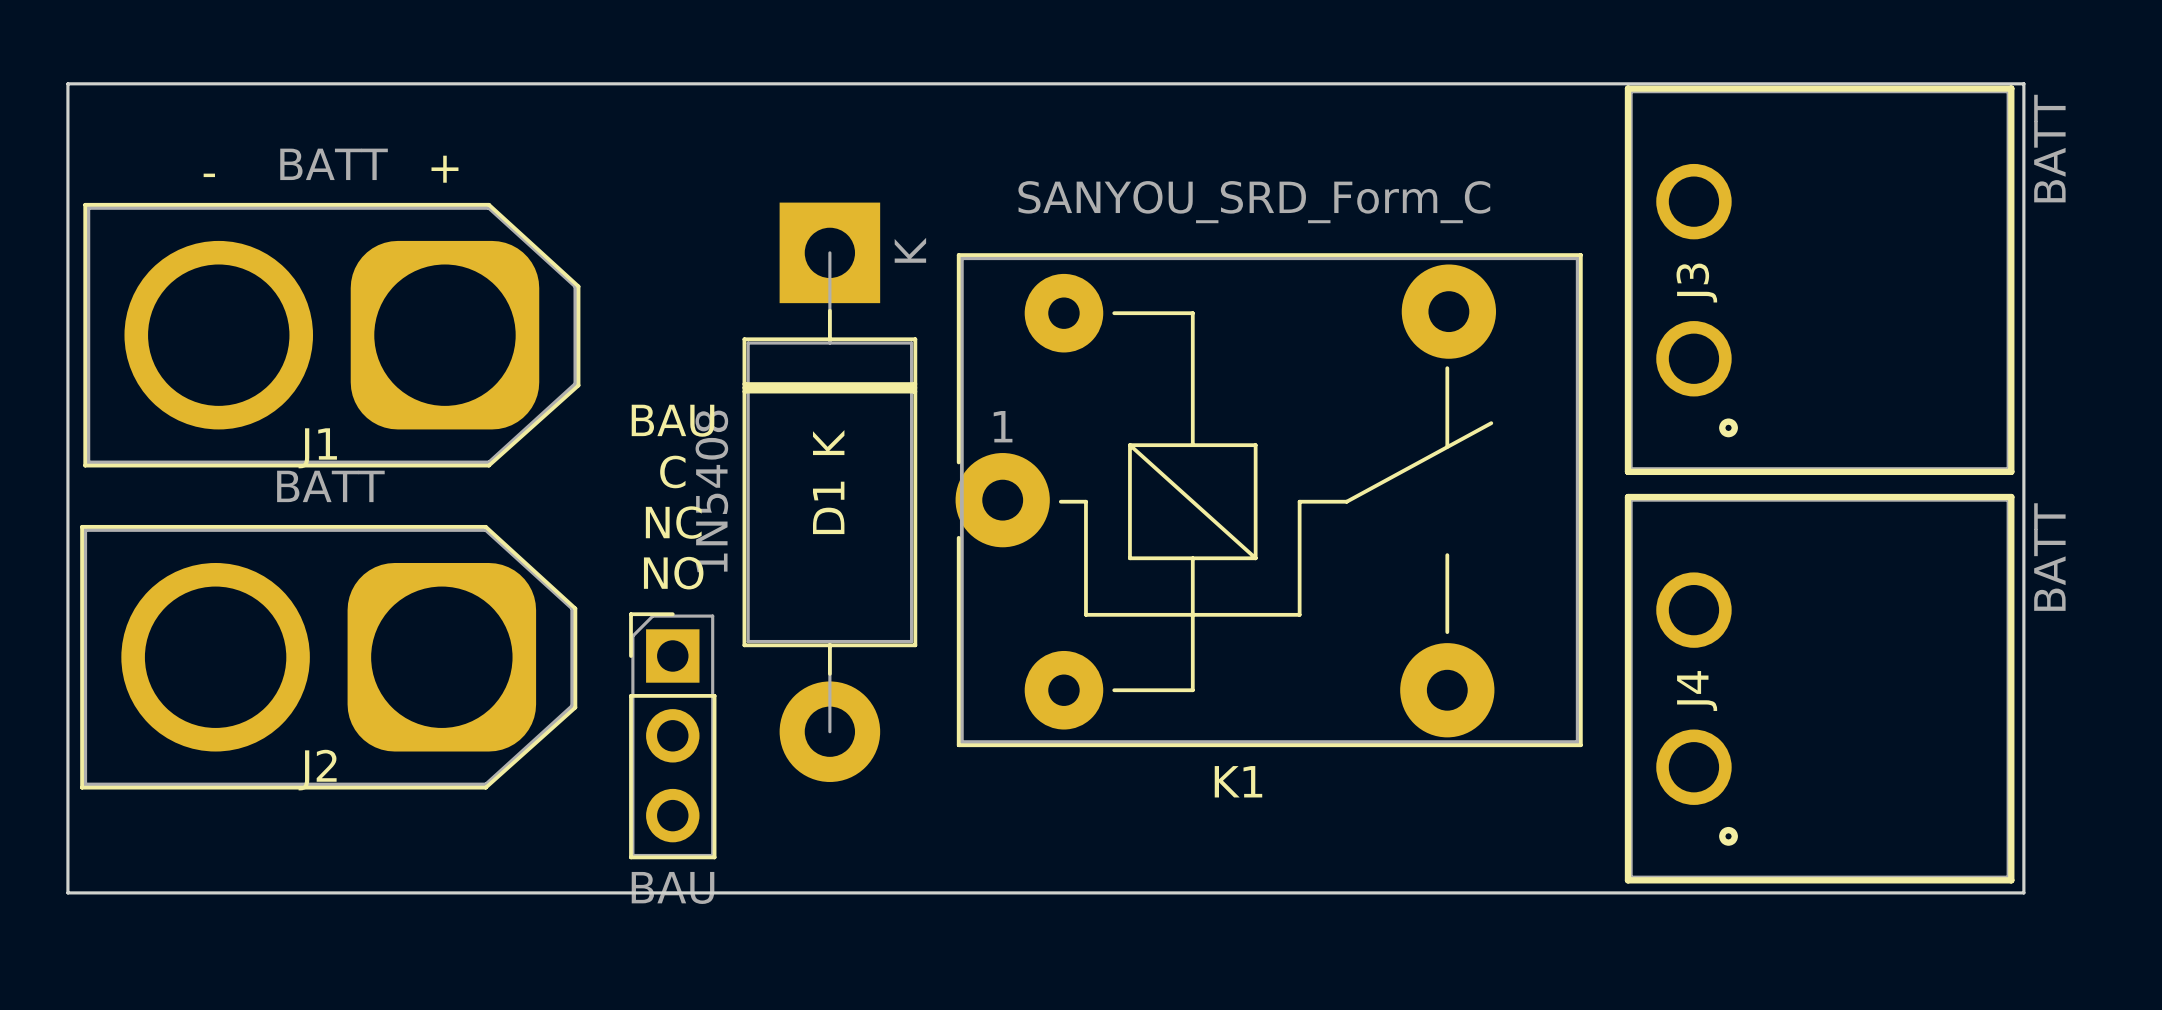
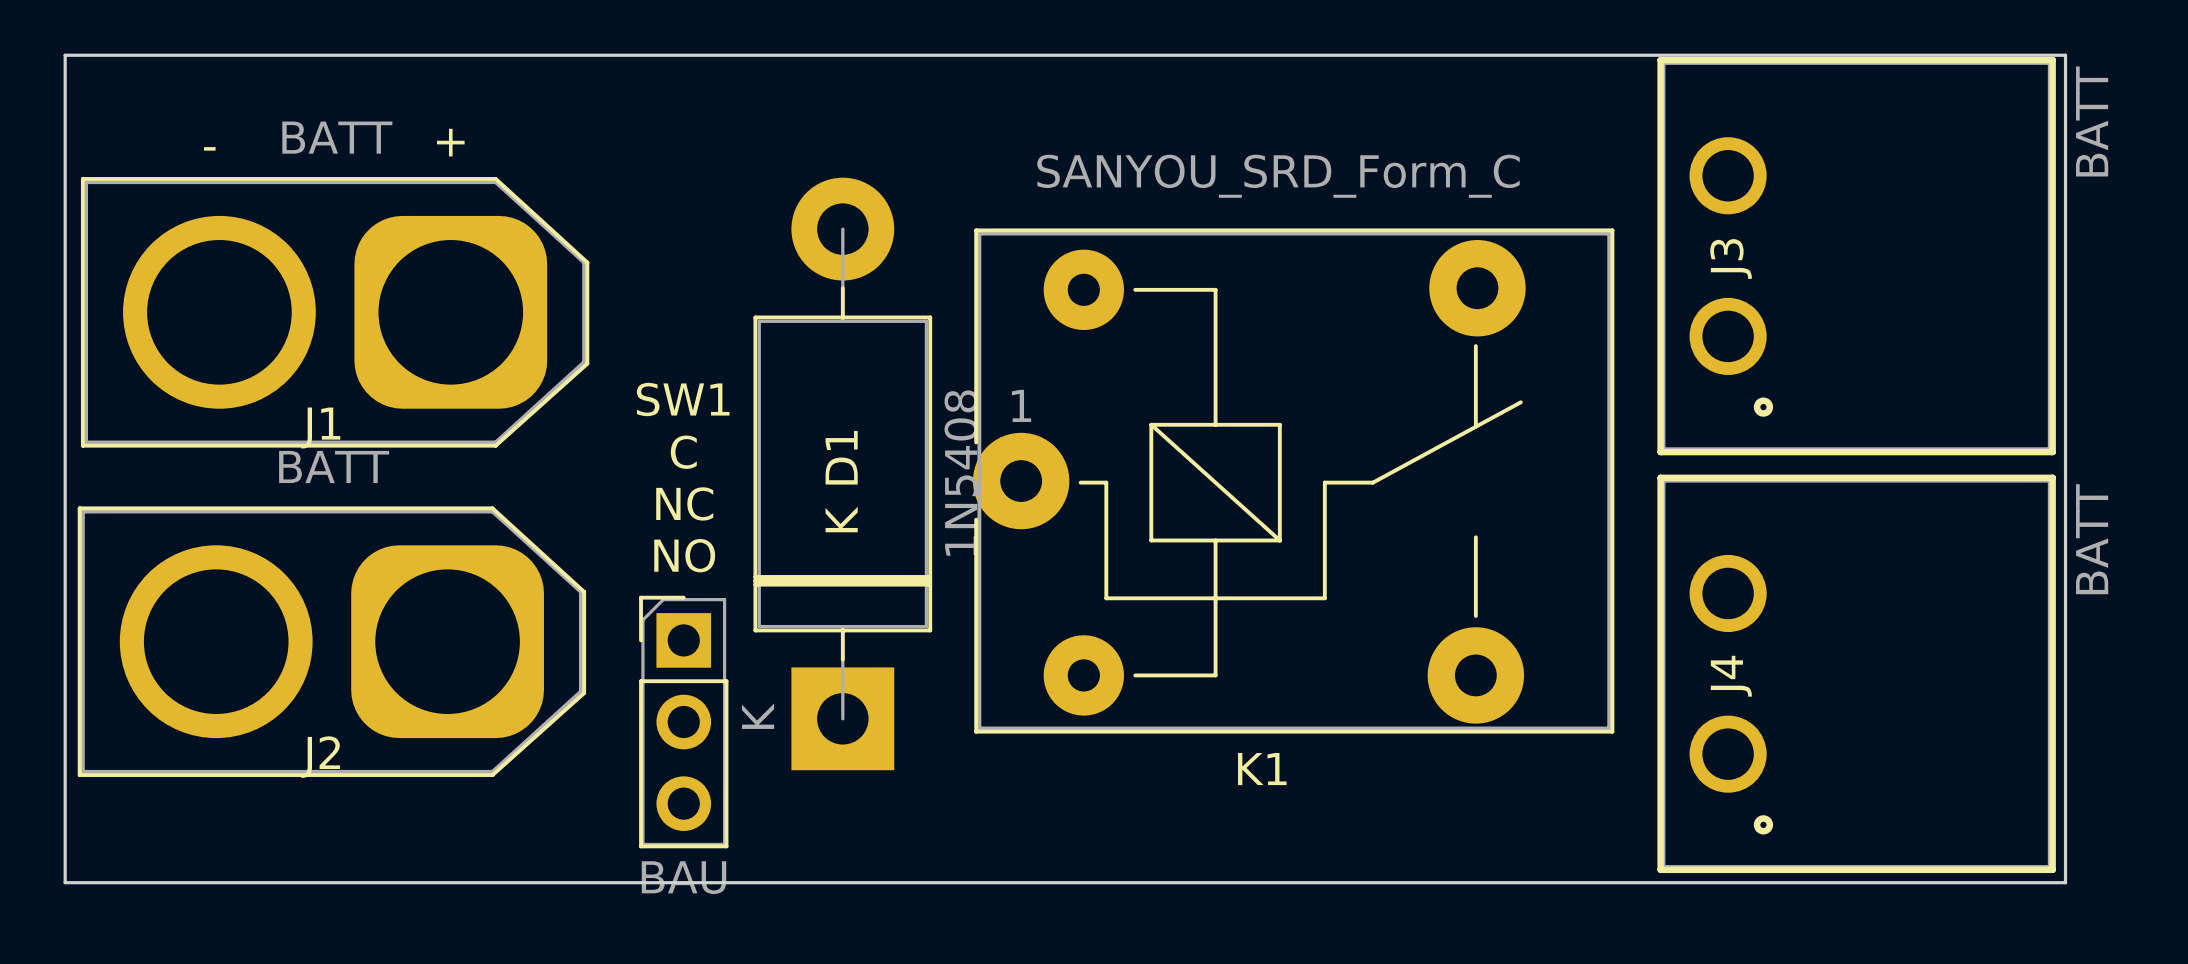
BAU name: BAU (673, 420) -> SW1 (683, 399)
D1 rotation: 0° (829, 492) -> 180° (842, 473)

